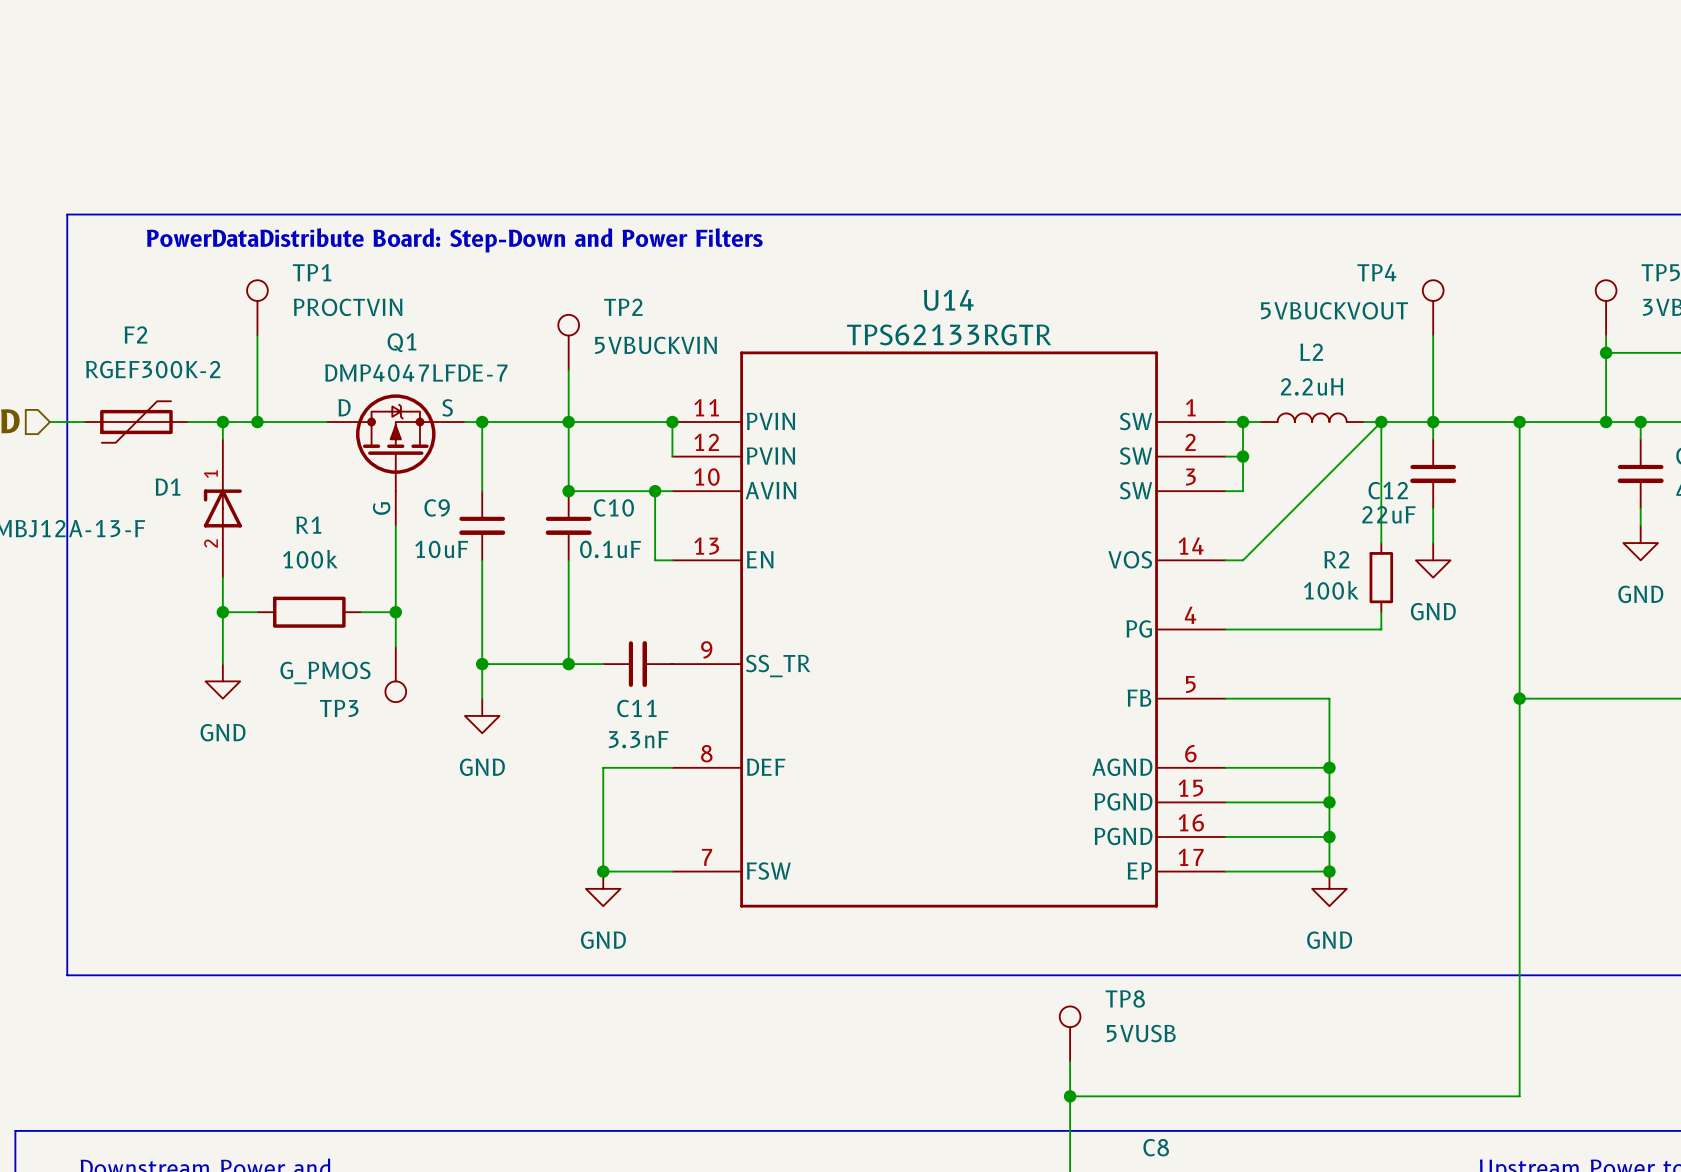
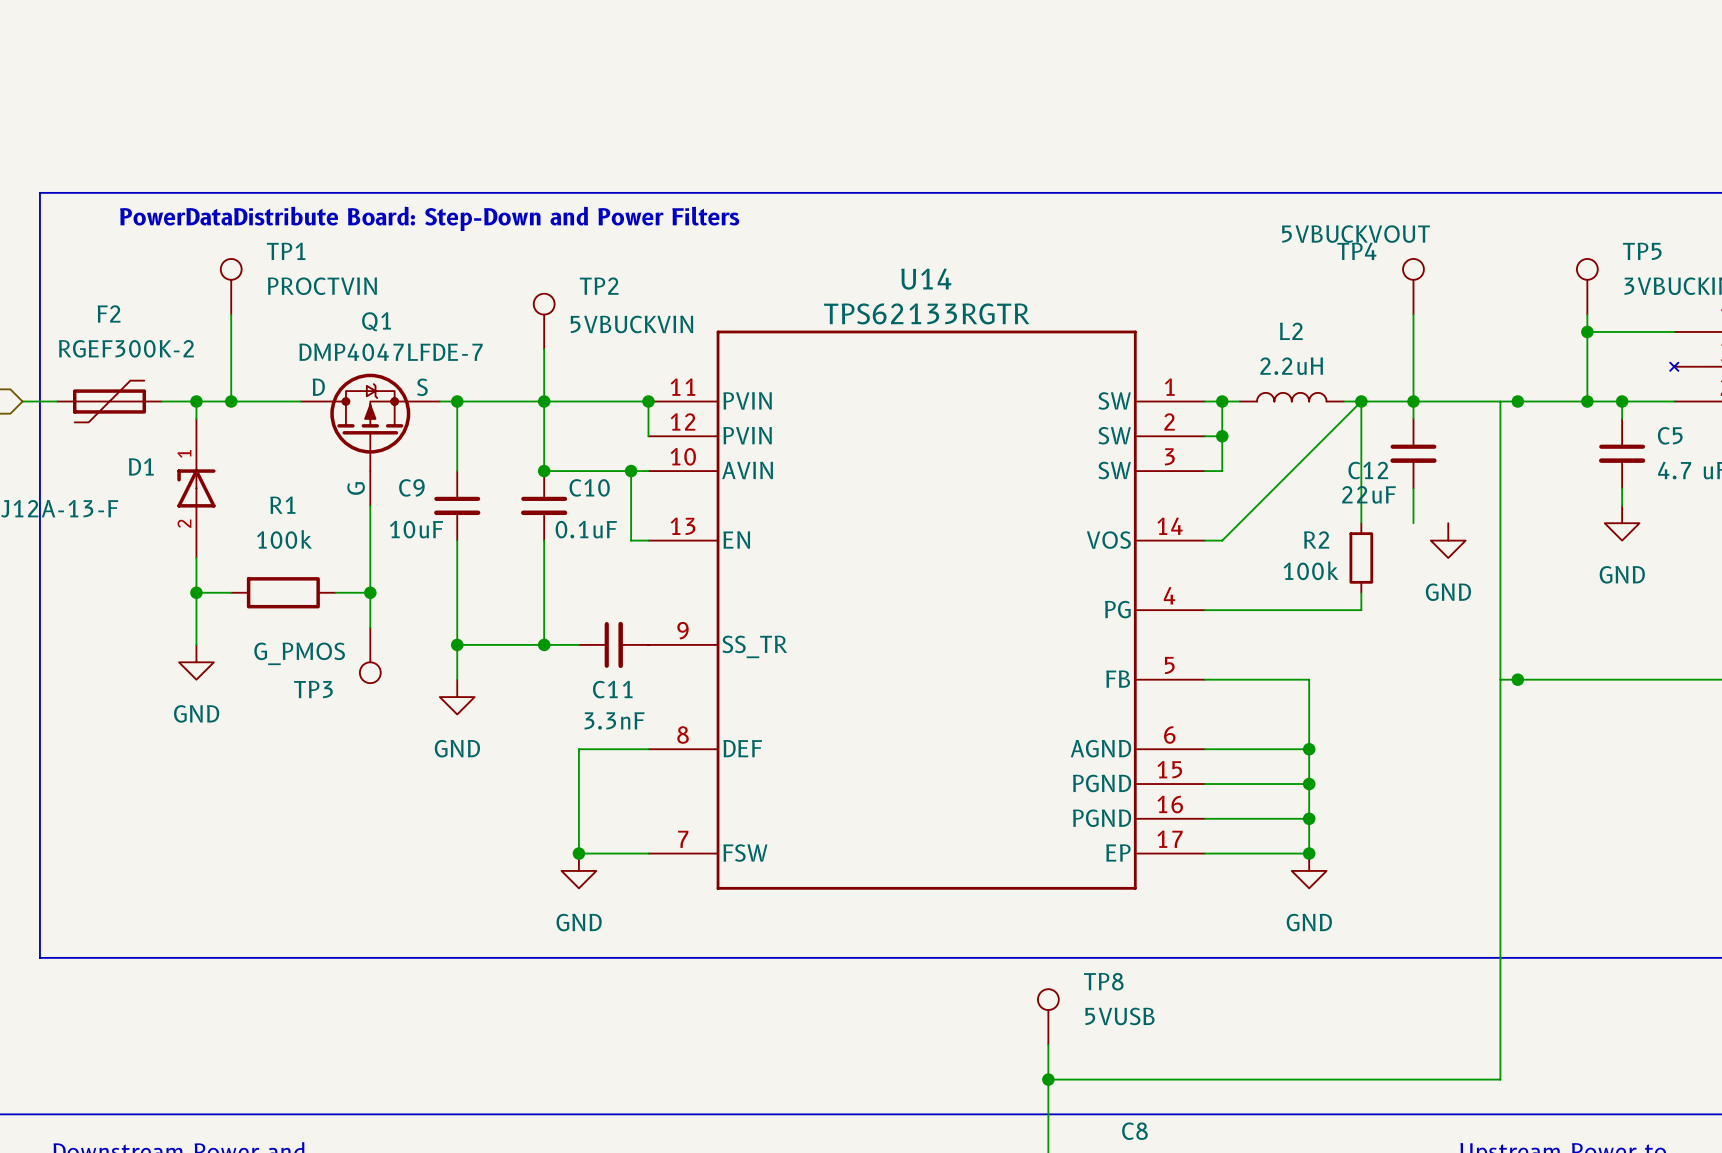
TP4 value position: 5VBUCKVOUT (1334, 310) -> 5VBUCKVOUT (1356, 234)
junction position: (1519, 422) -> (1517, 401)
power symbol position: GND (1433, 560) -> GND (1448, 540)
junction position: (1519, 698) -> (1517, 679)

